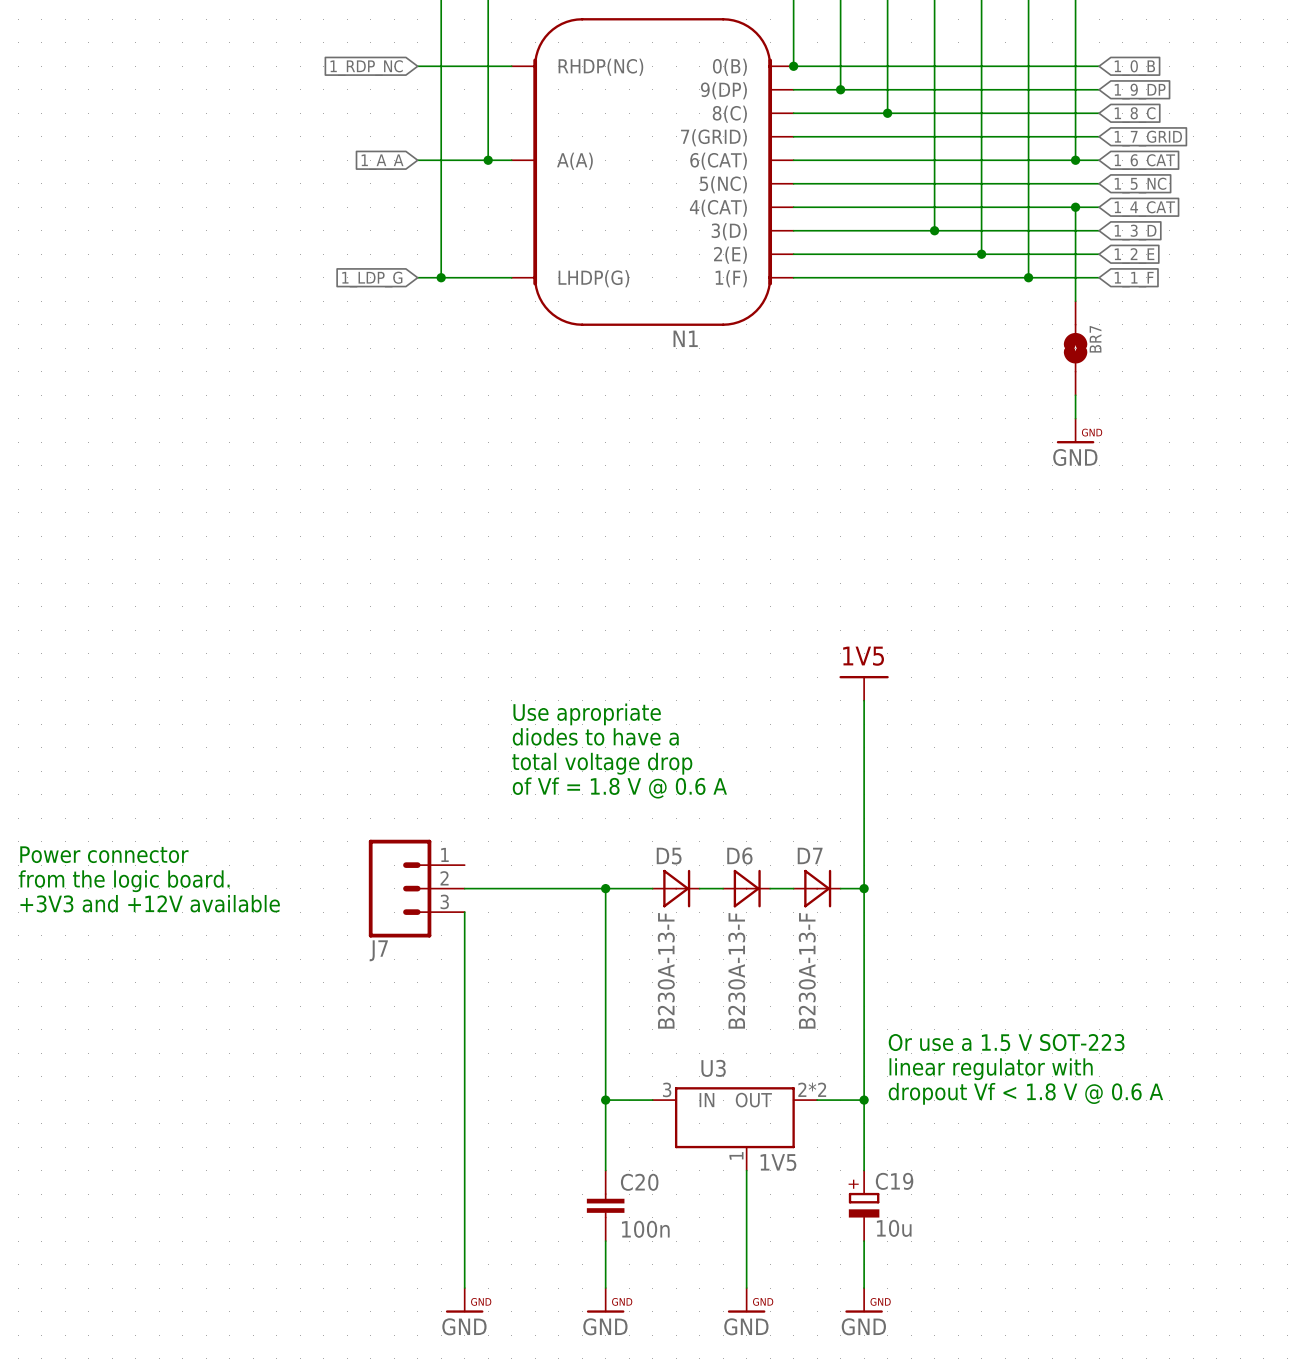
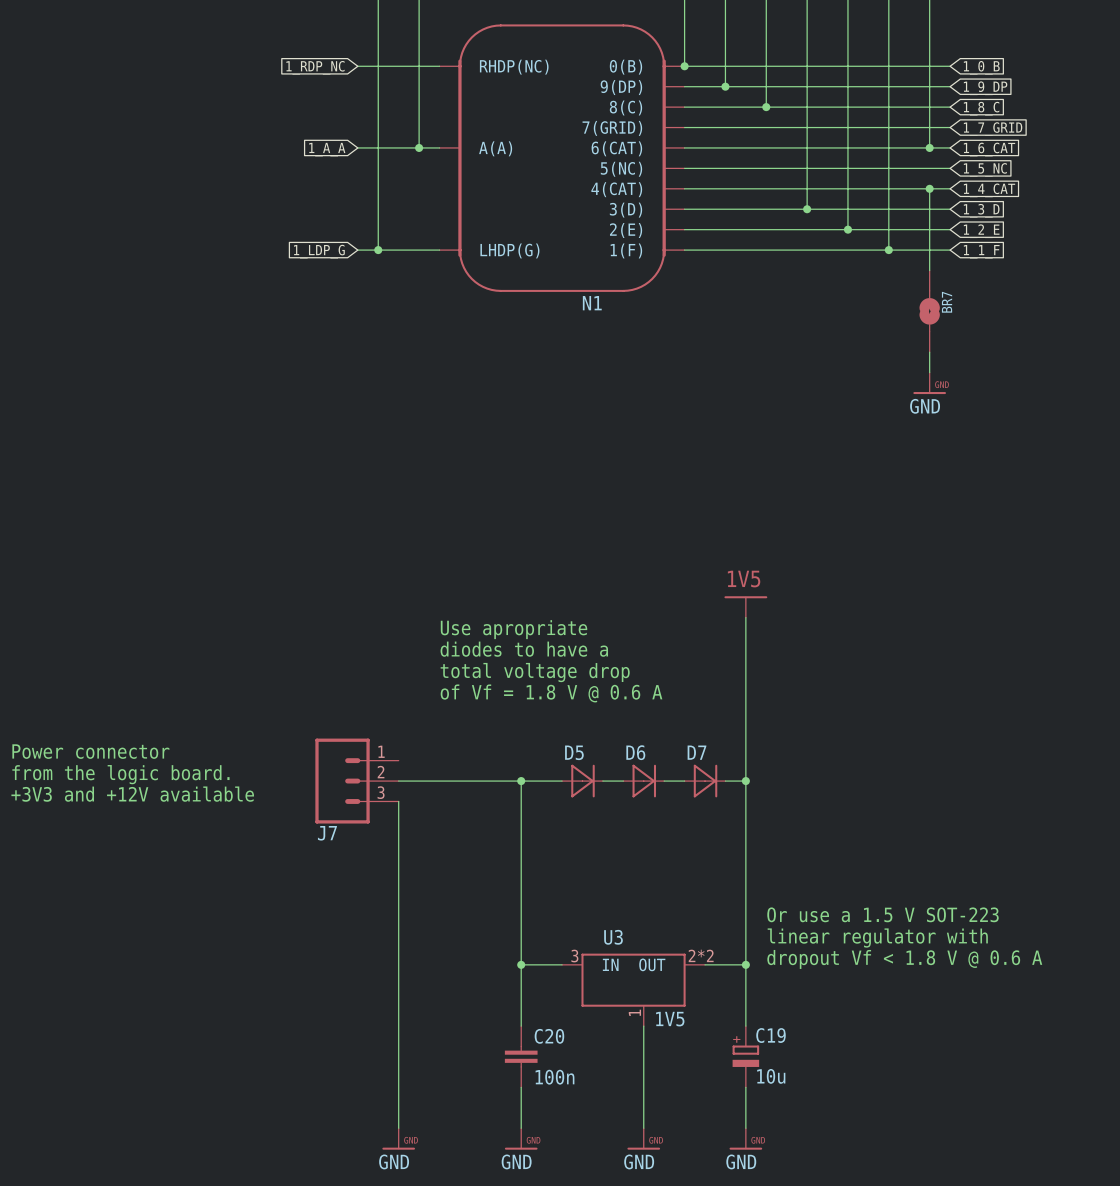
D5 value: B230A-13-F (666, 970) -> none
D6 value: B230A-13-F (736, 970) -> none
D7 value: B230A-13-F (807, 970) -> none

